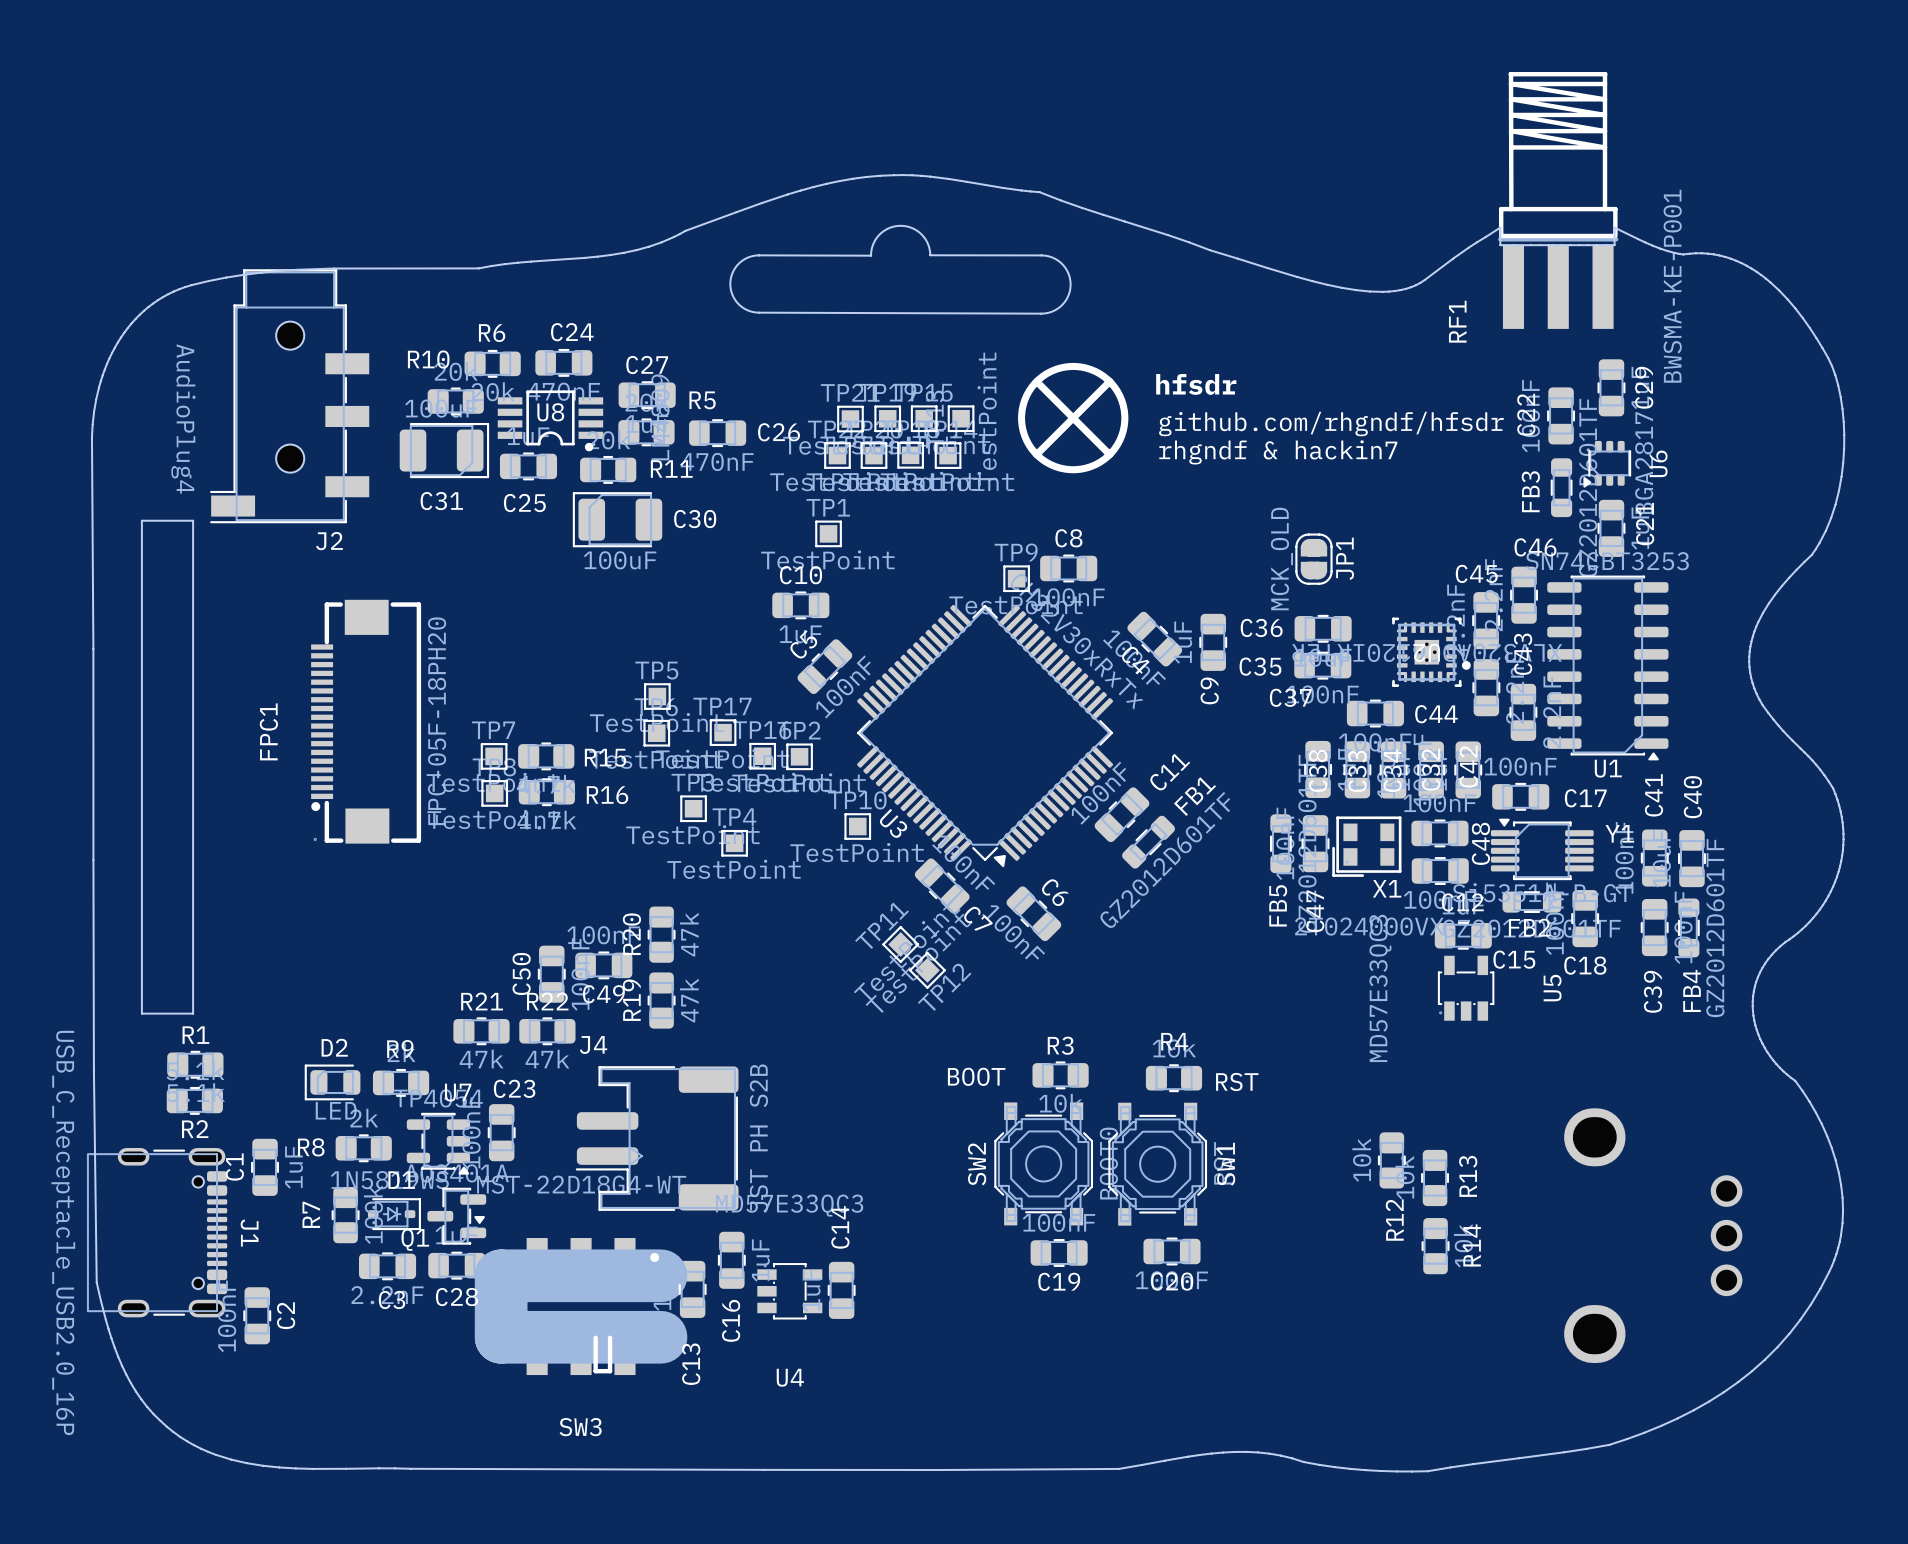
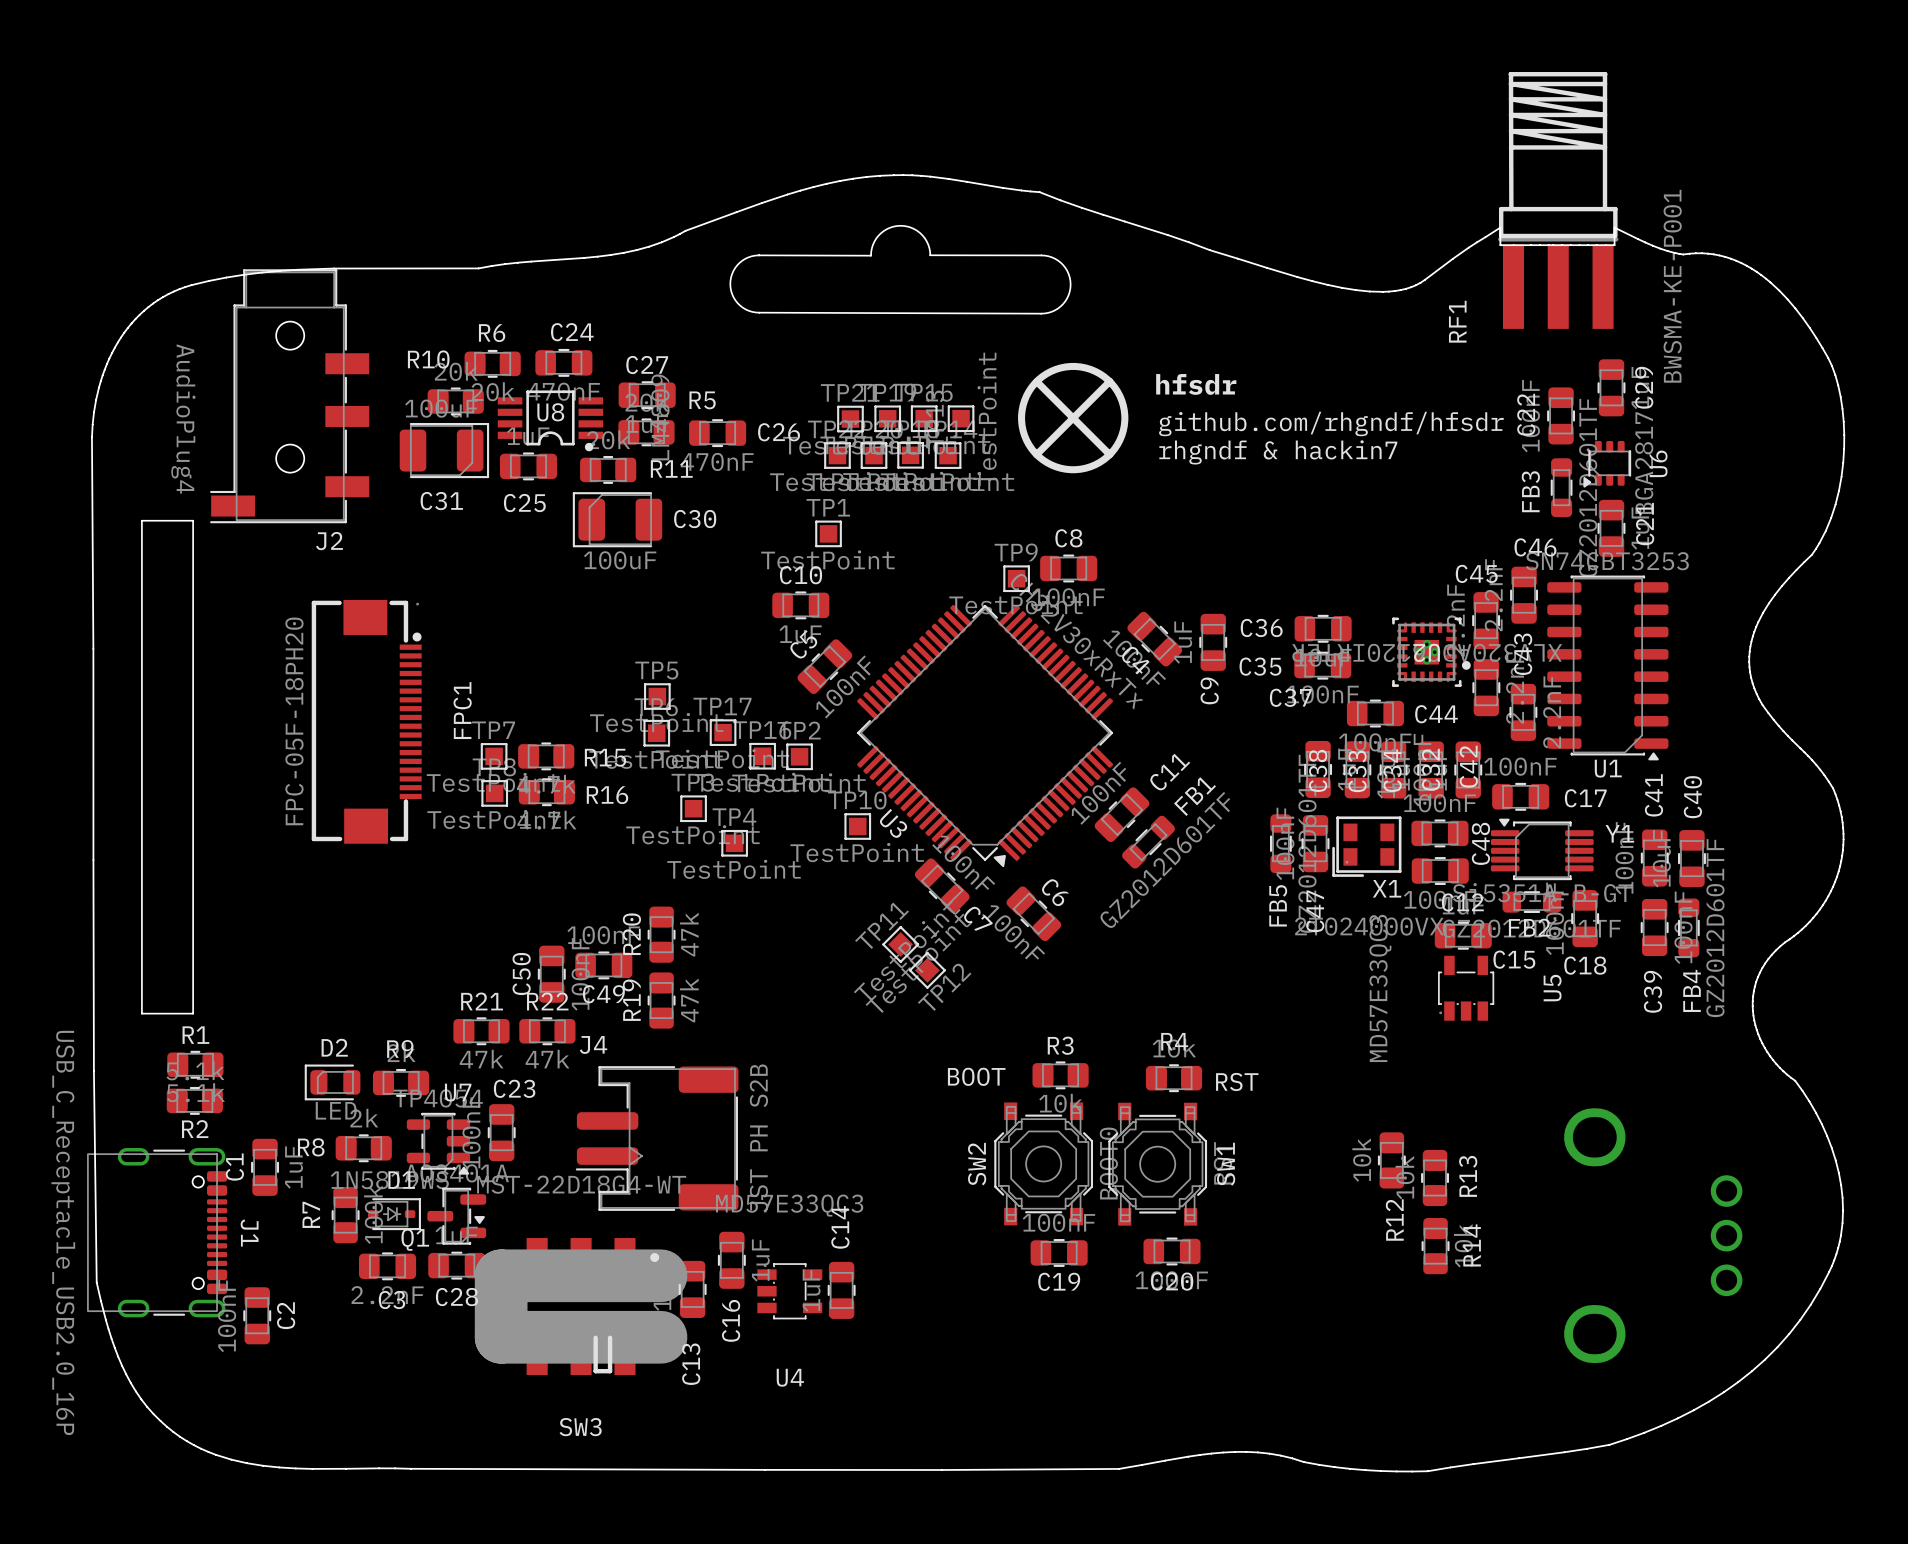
JP1: MCK_OLD (1313, 559) -> none
FPC1 rotation: 0° (366, 721) -> 180° (366, 721)

